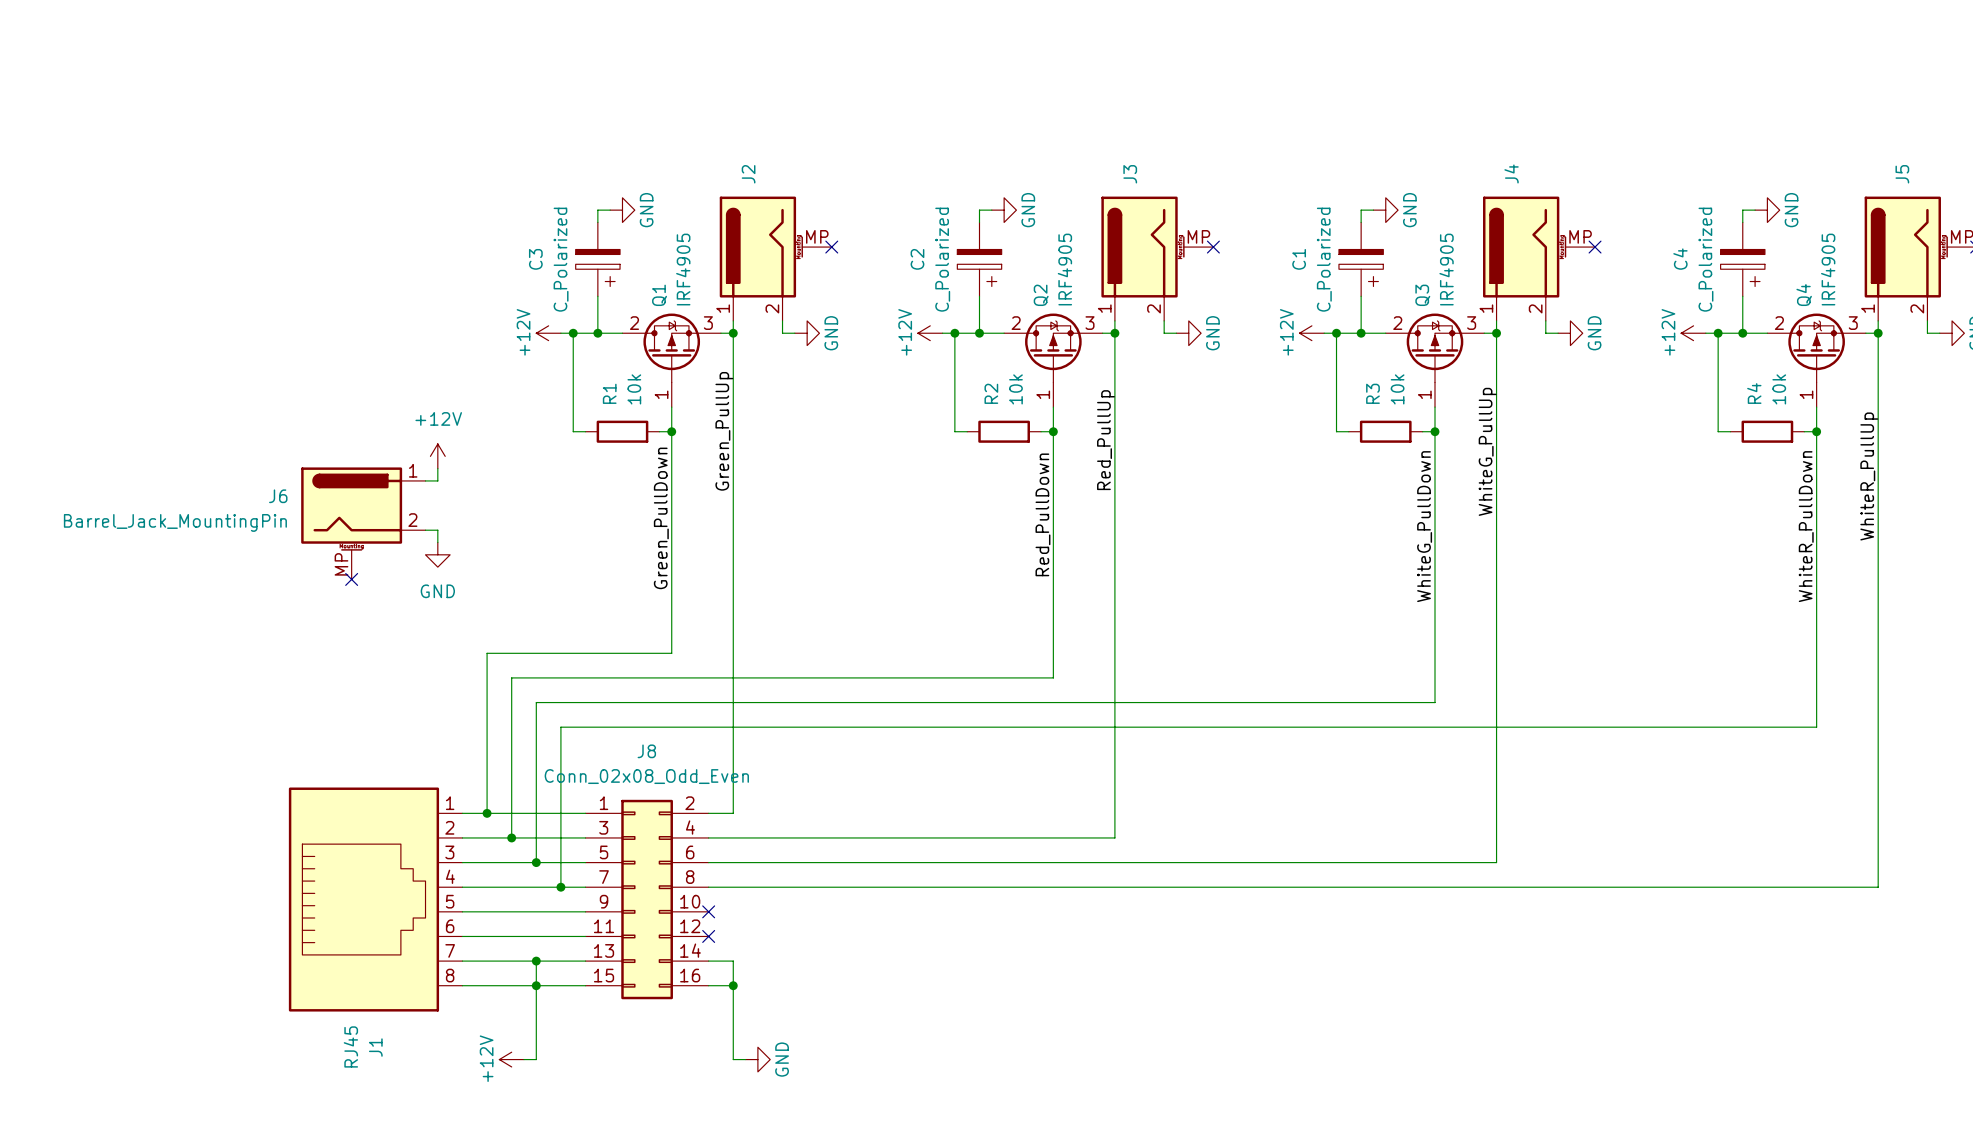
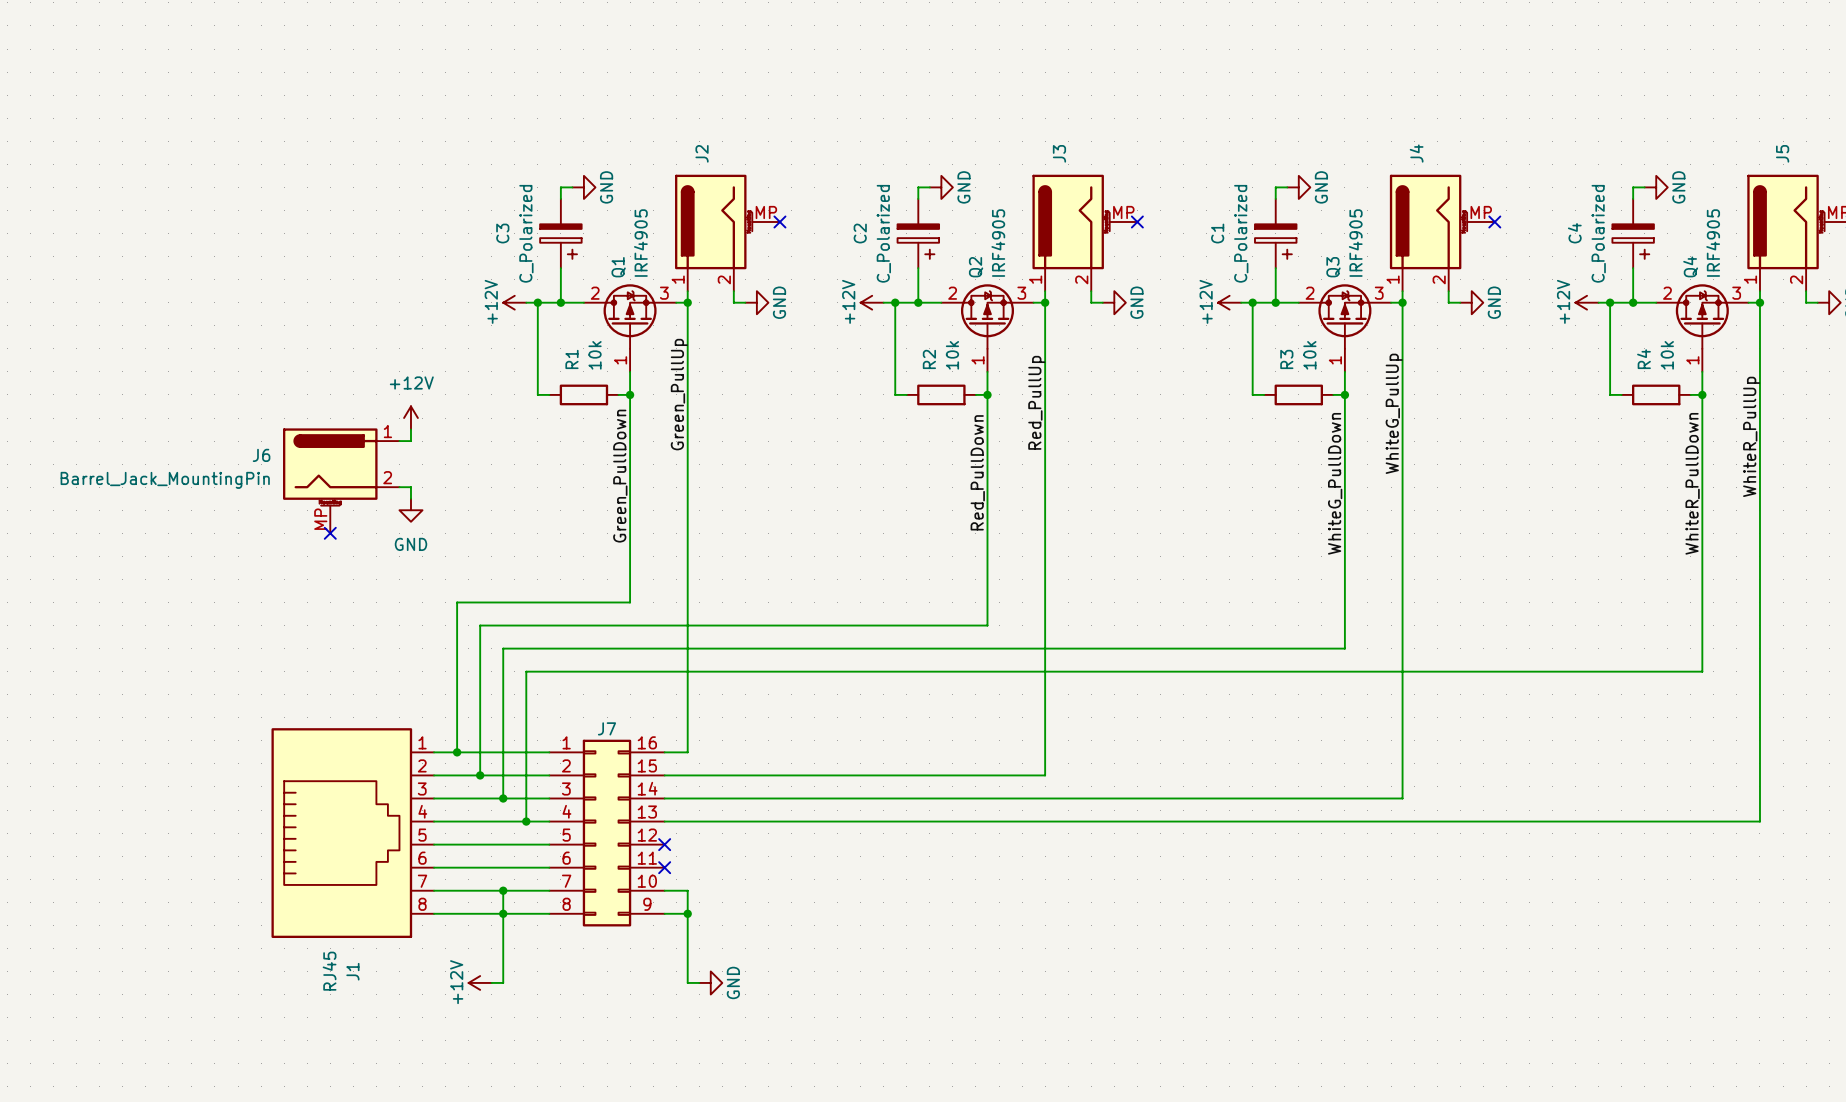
J8 name: J8 (646, 751) -> J7 (607, 728)
J8 value: Conn_02x08_Odd_Even (646, 776) -> none
J8 symbol: [585, 799, 709, 1000] -> [549, 739, 665, 927]

